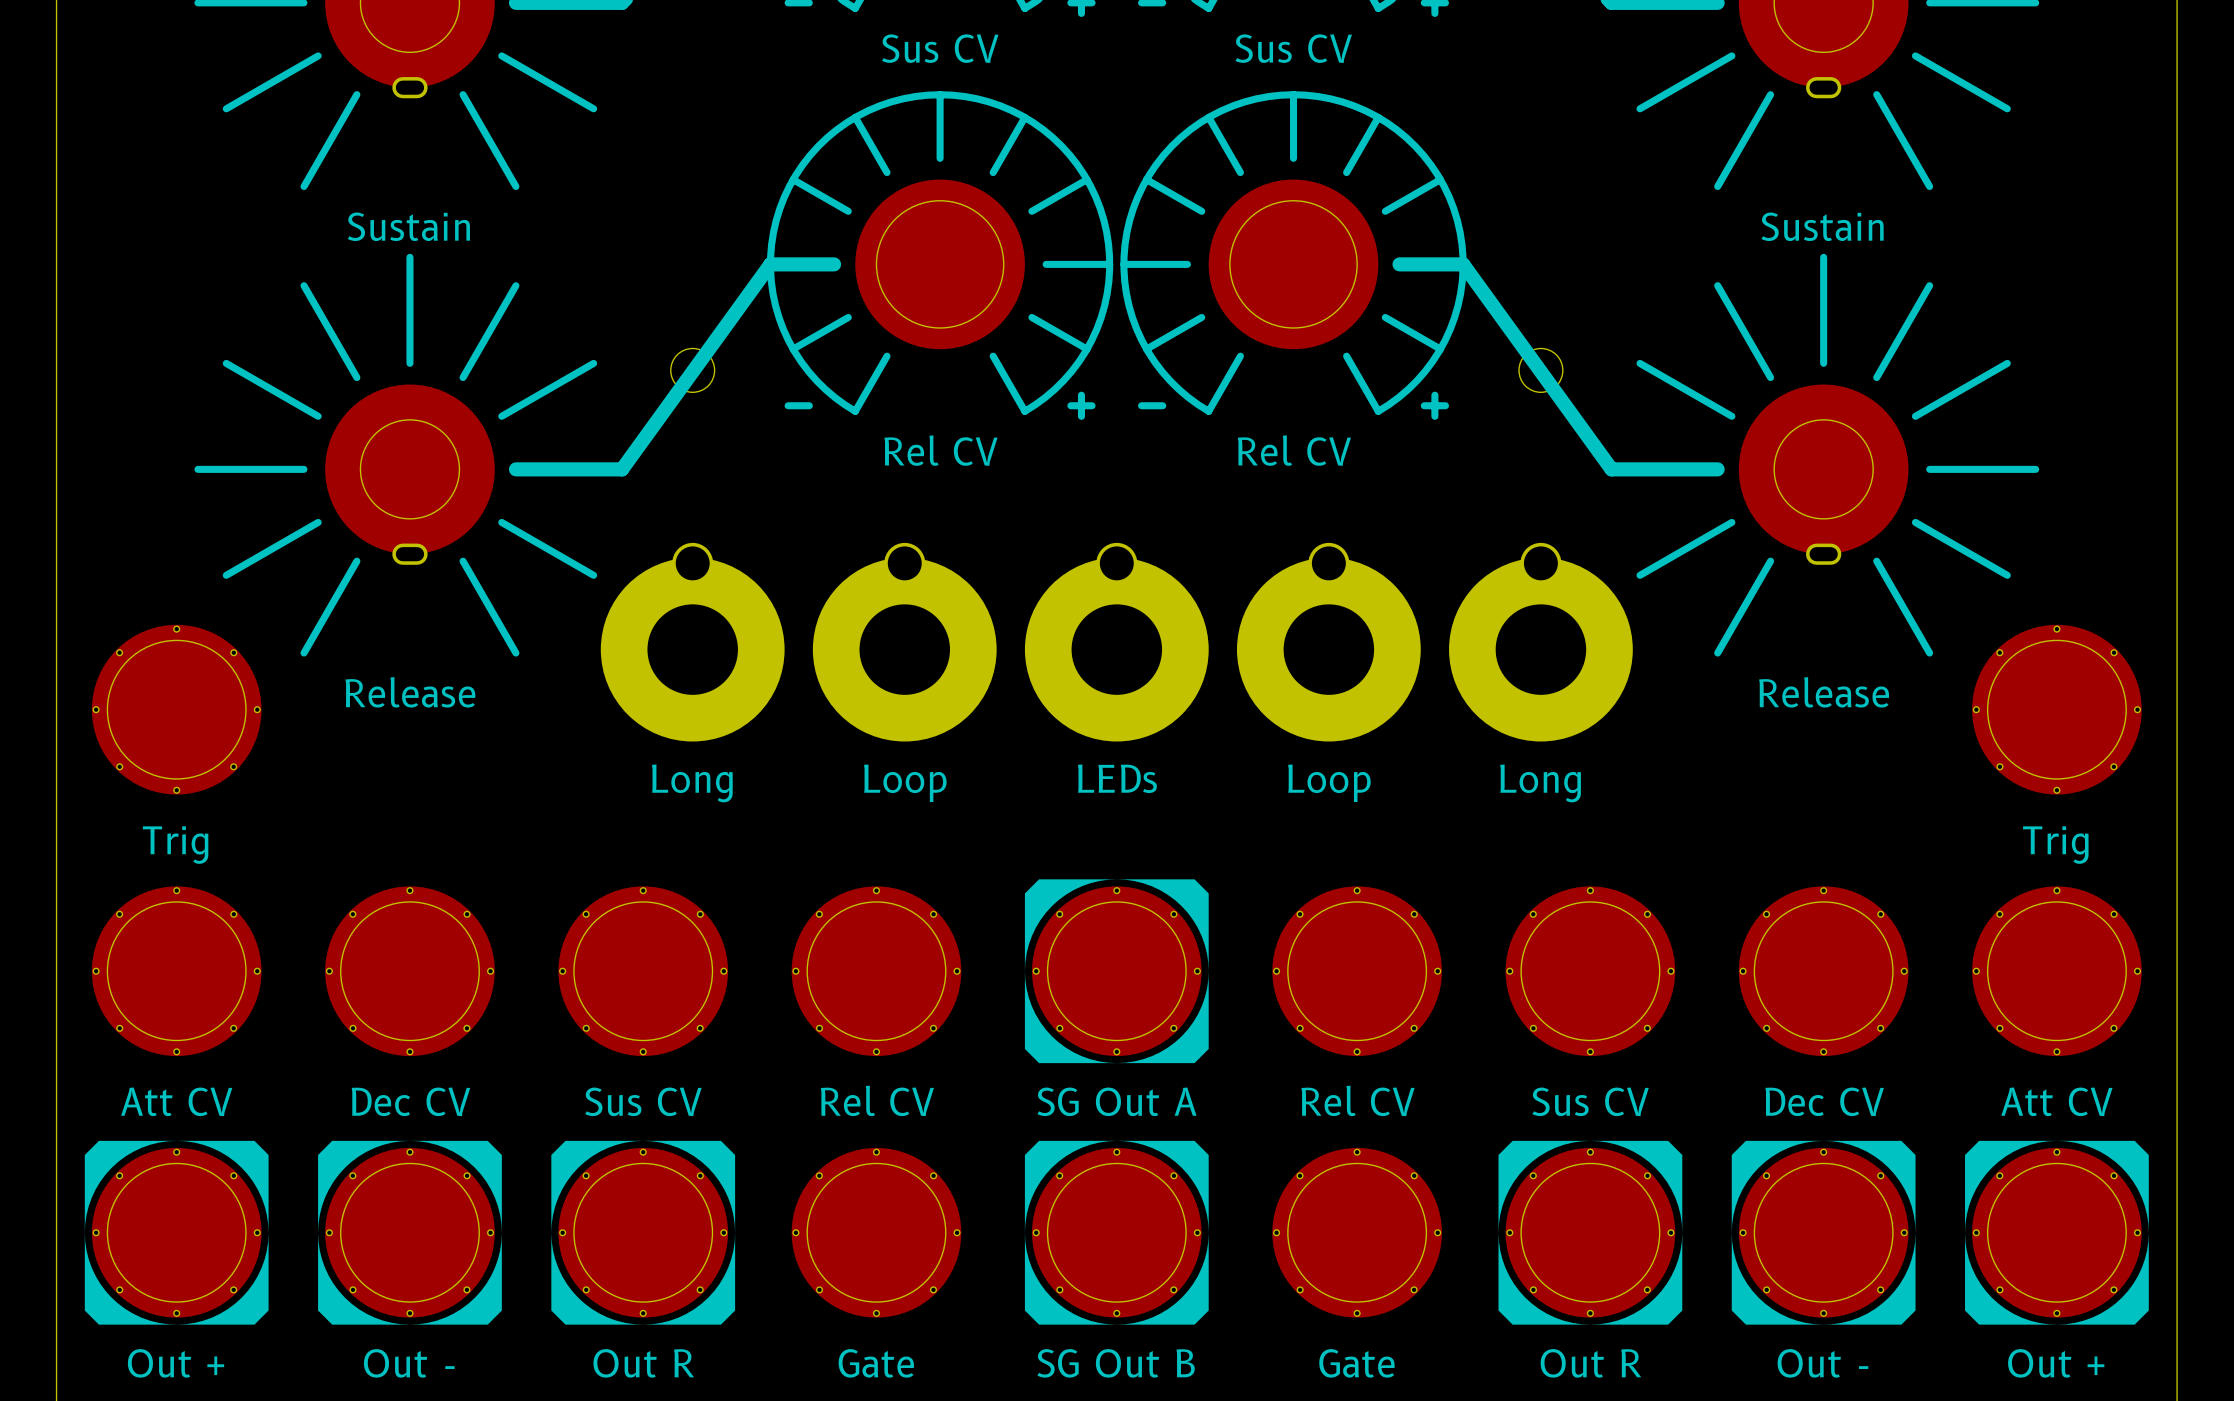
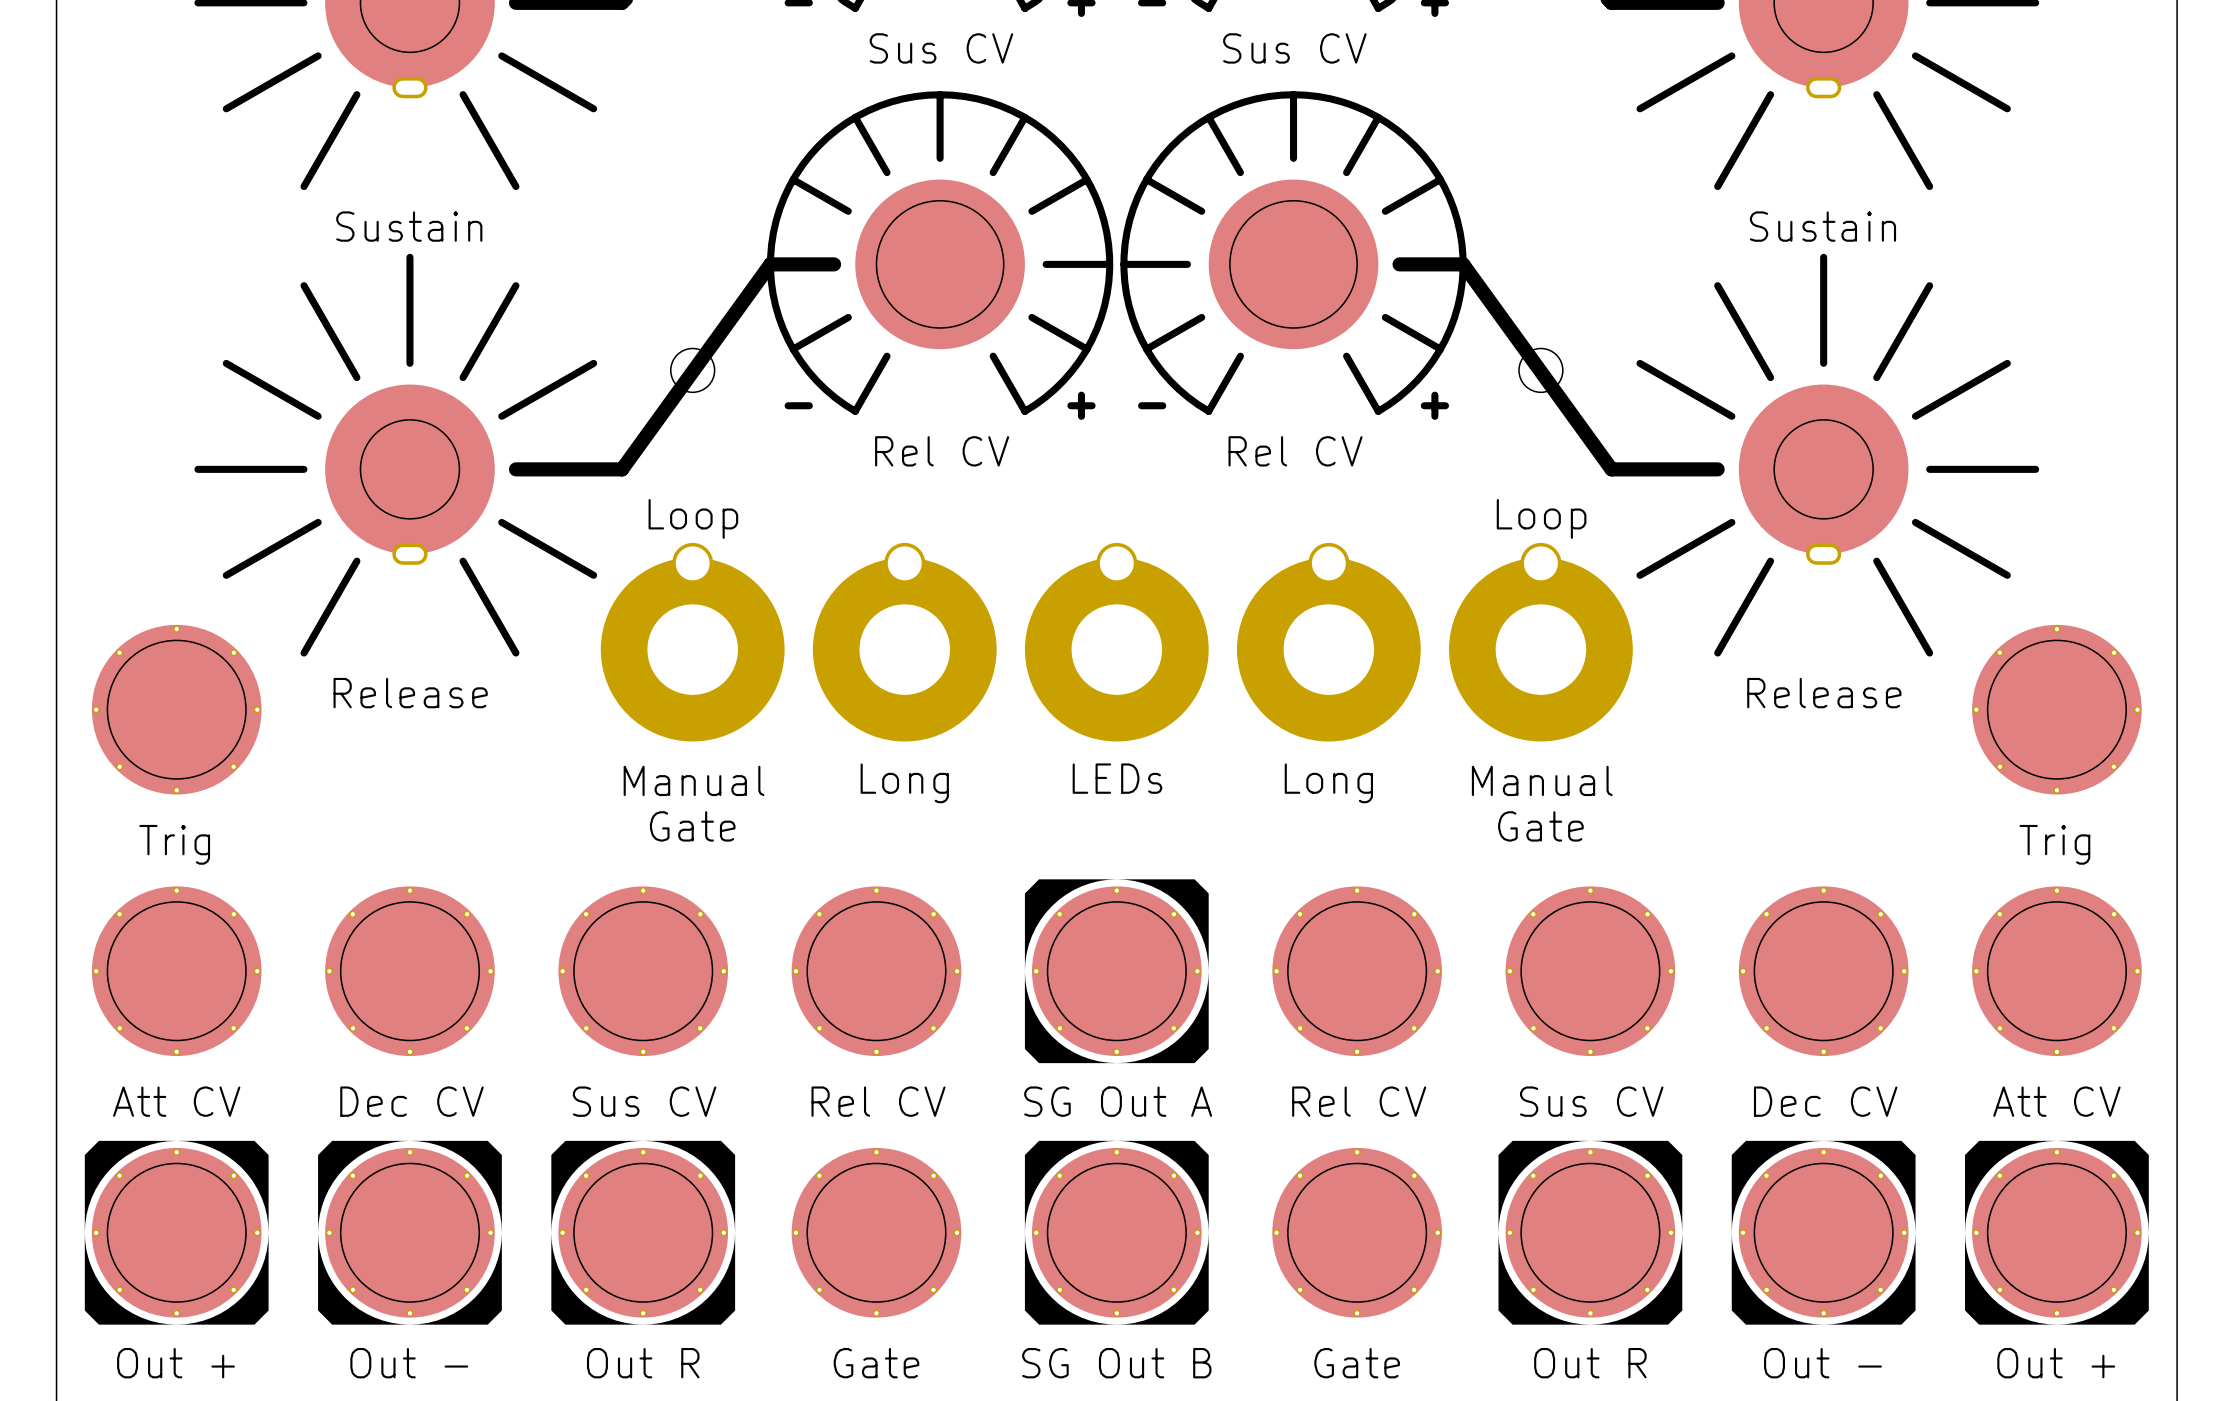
text: none -> Manual (694, 780)
text: none -> Manual (1542, 780)
part value: Long (692, 783) -> Loop (693, 518)
part value: Loop (905, 783) -> Long (904, 783)
part value: Loop (1329, 783) -> Long (1328, 783)
part value: Long (1540, 783) -> Loop (1541, 518)
text: none -> Gate (692, 826)
text: none -> Gate (1540, 826)

